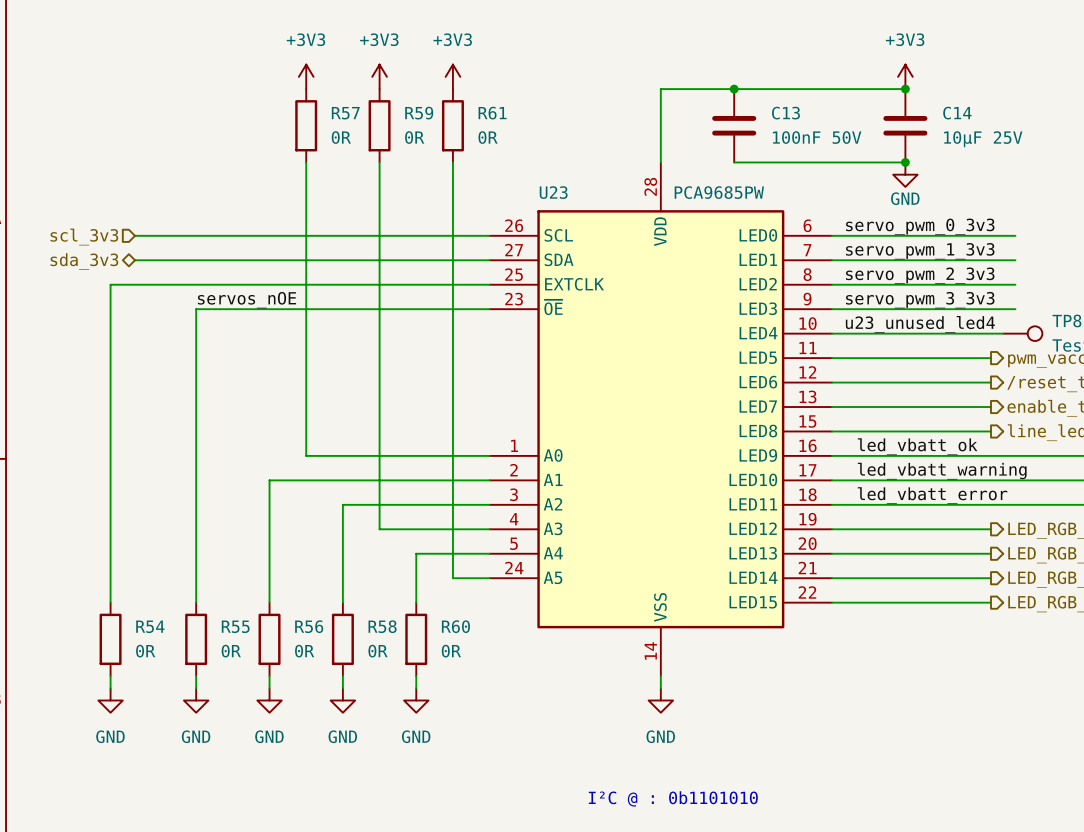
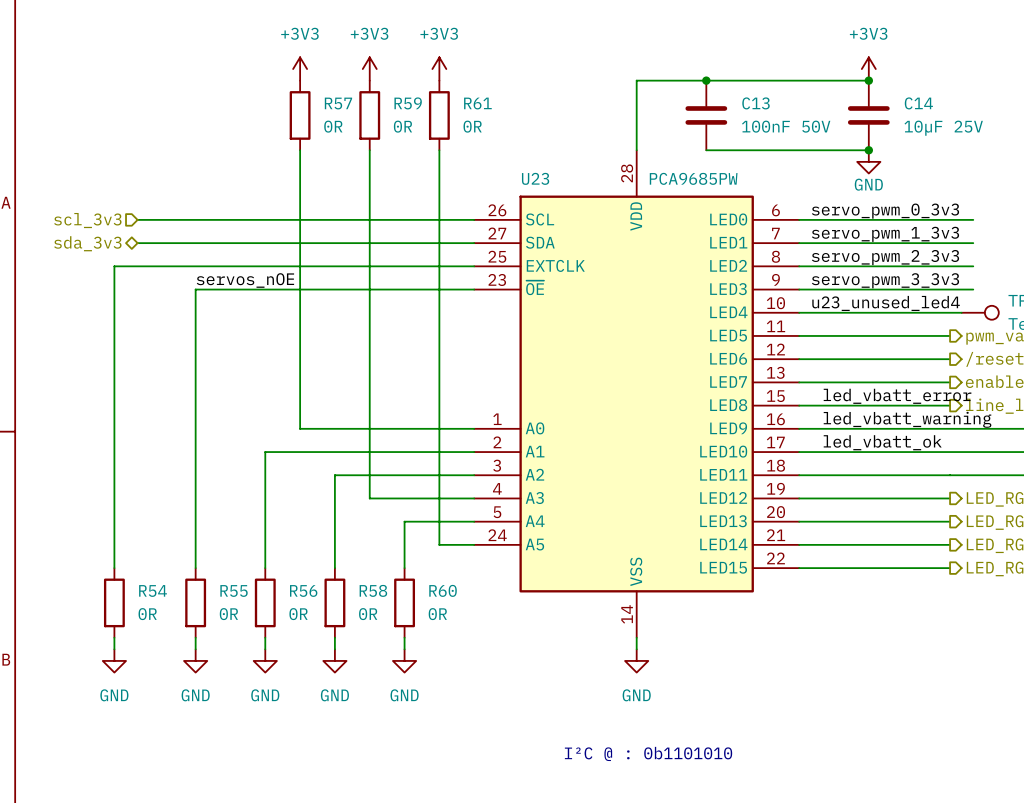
label: led_vbatt_ok (917, 446) -> led_vbatt_warning (907, 419)
label: led_vbatt_warning (942, 471) -> led_vbatt_ok (882, 442)
label position: led_vbatt_error (932, 495) -> led_vbatt_error (897, 396)

